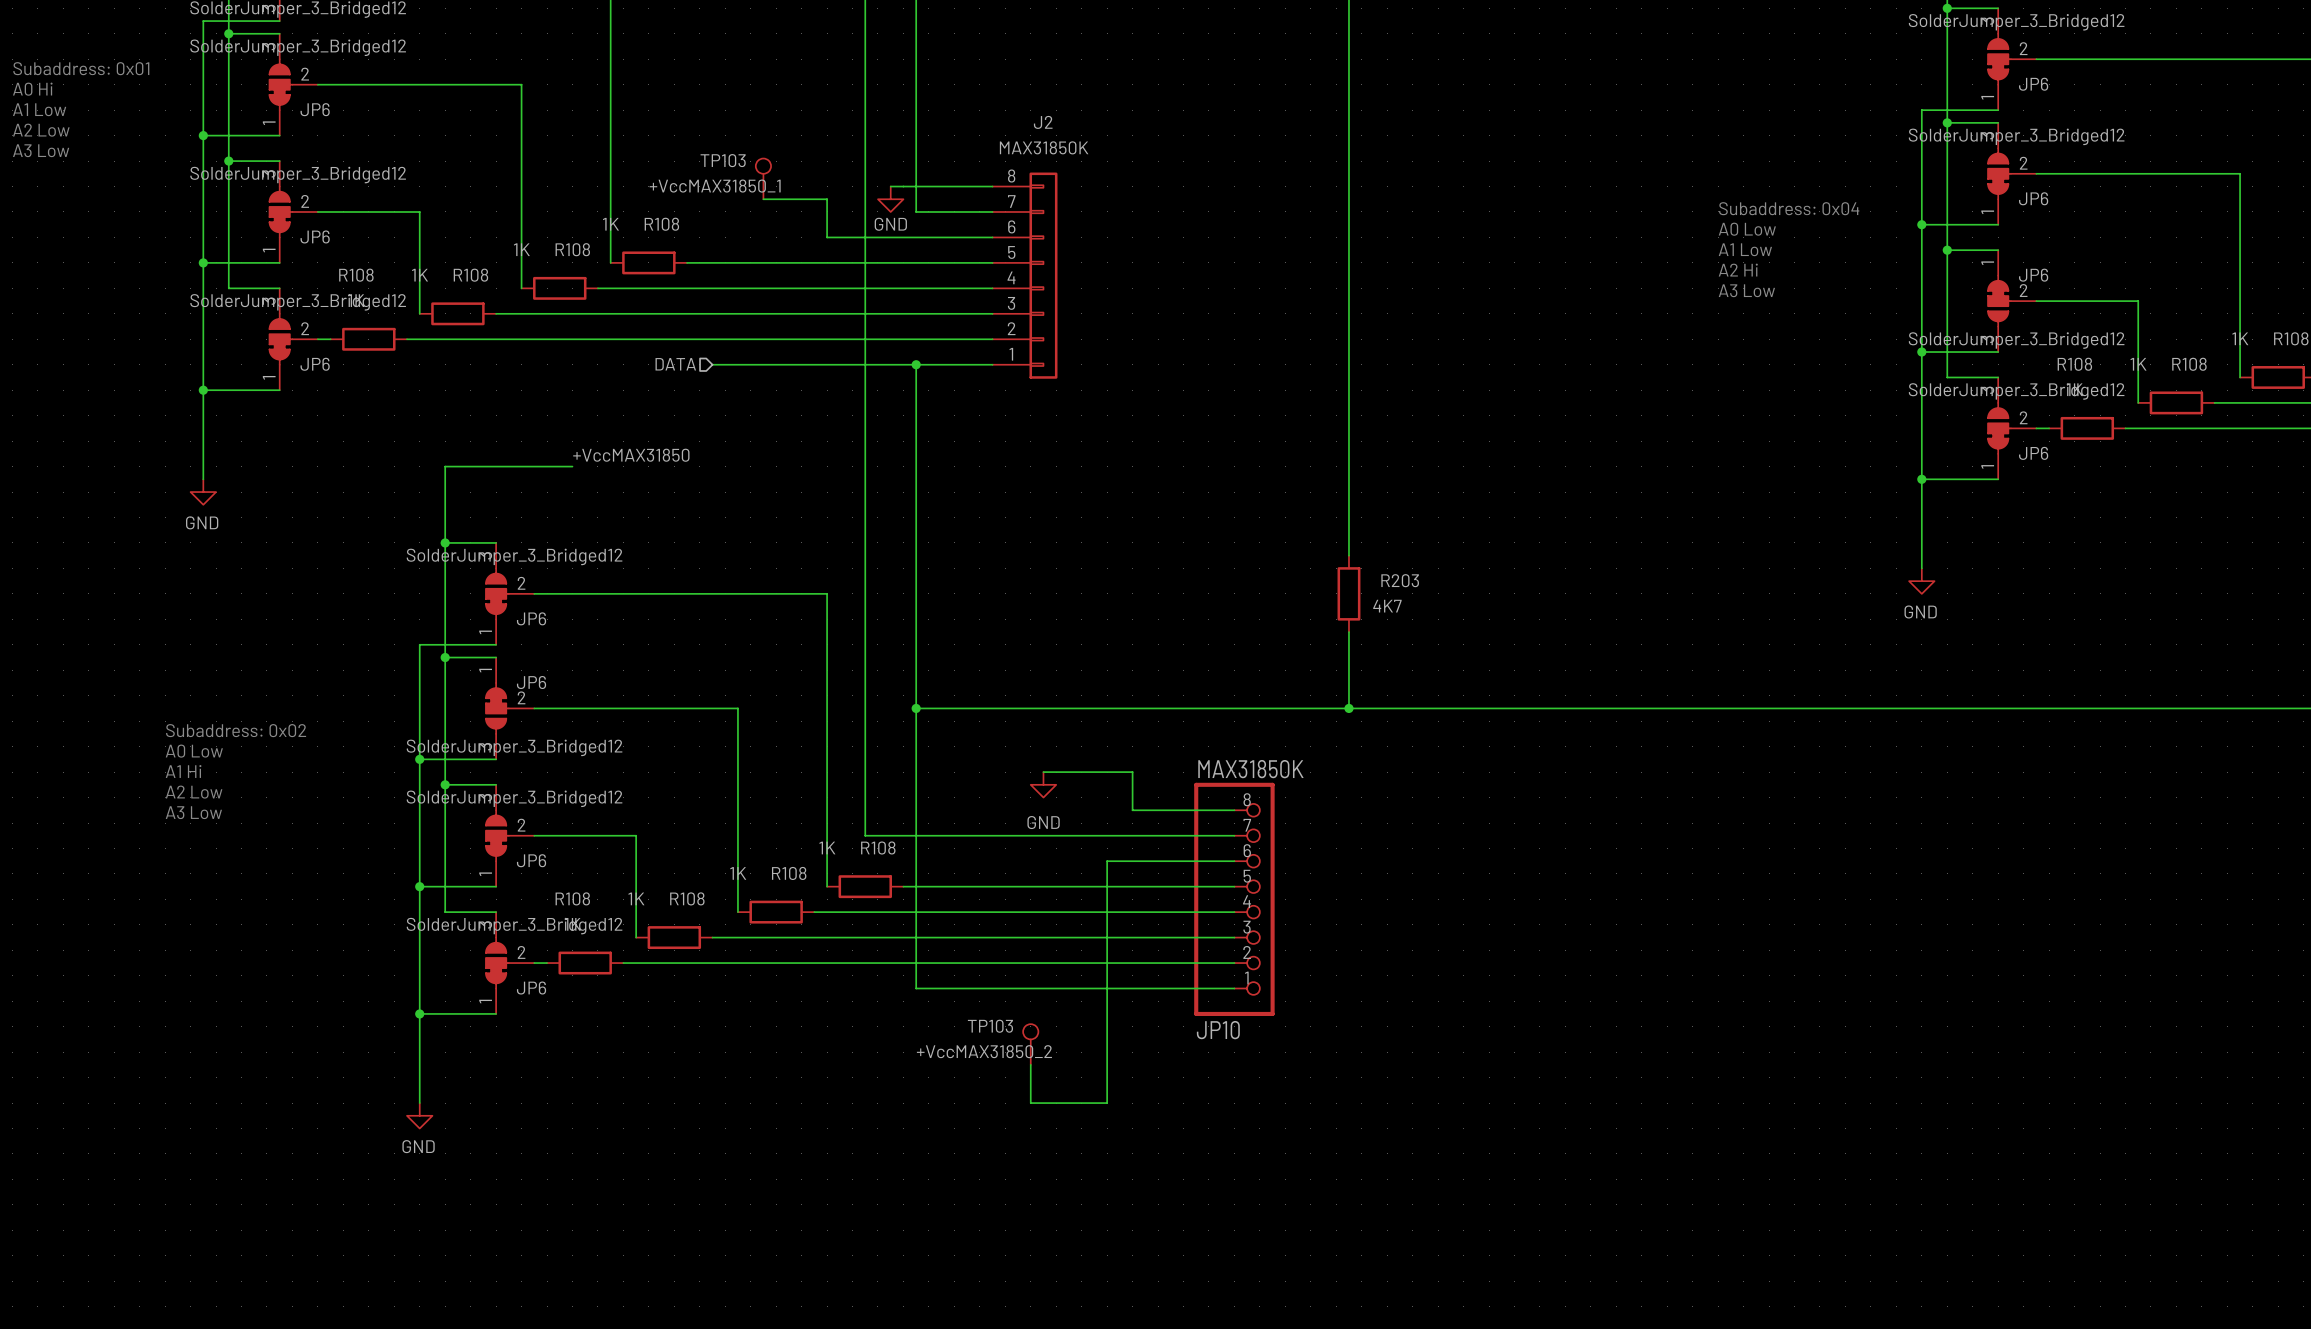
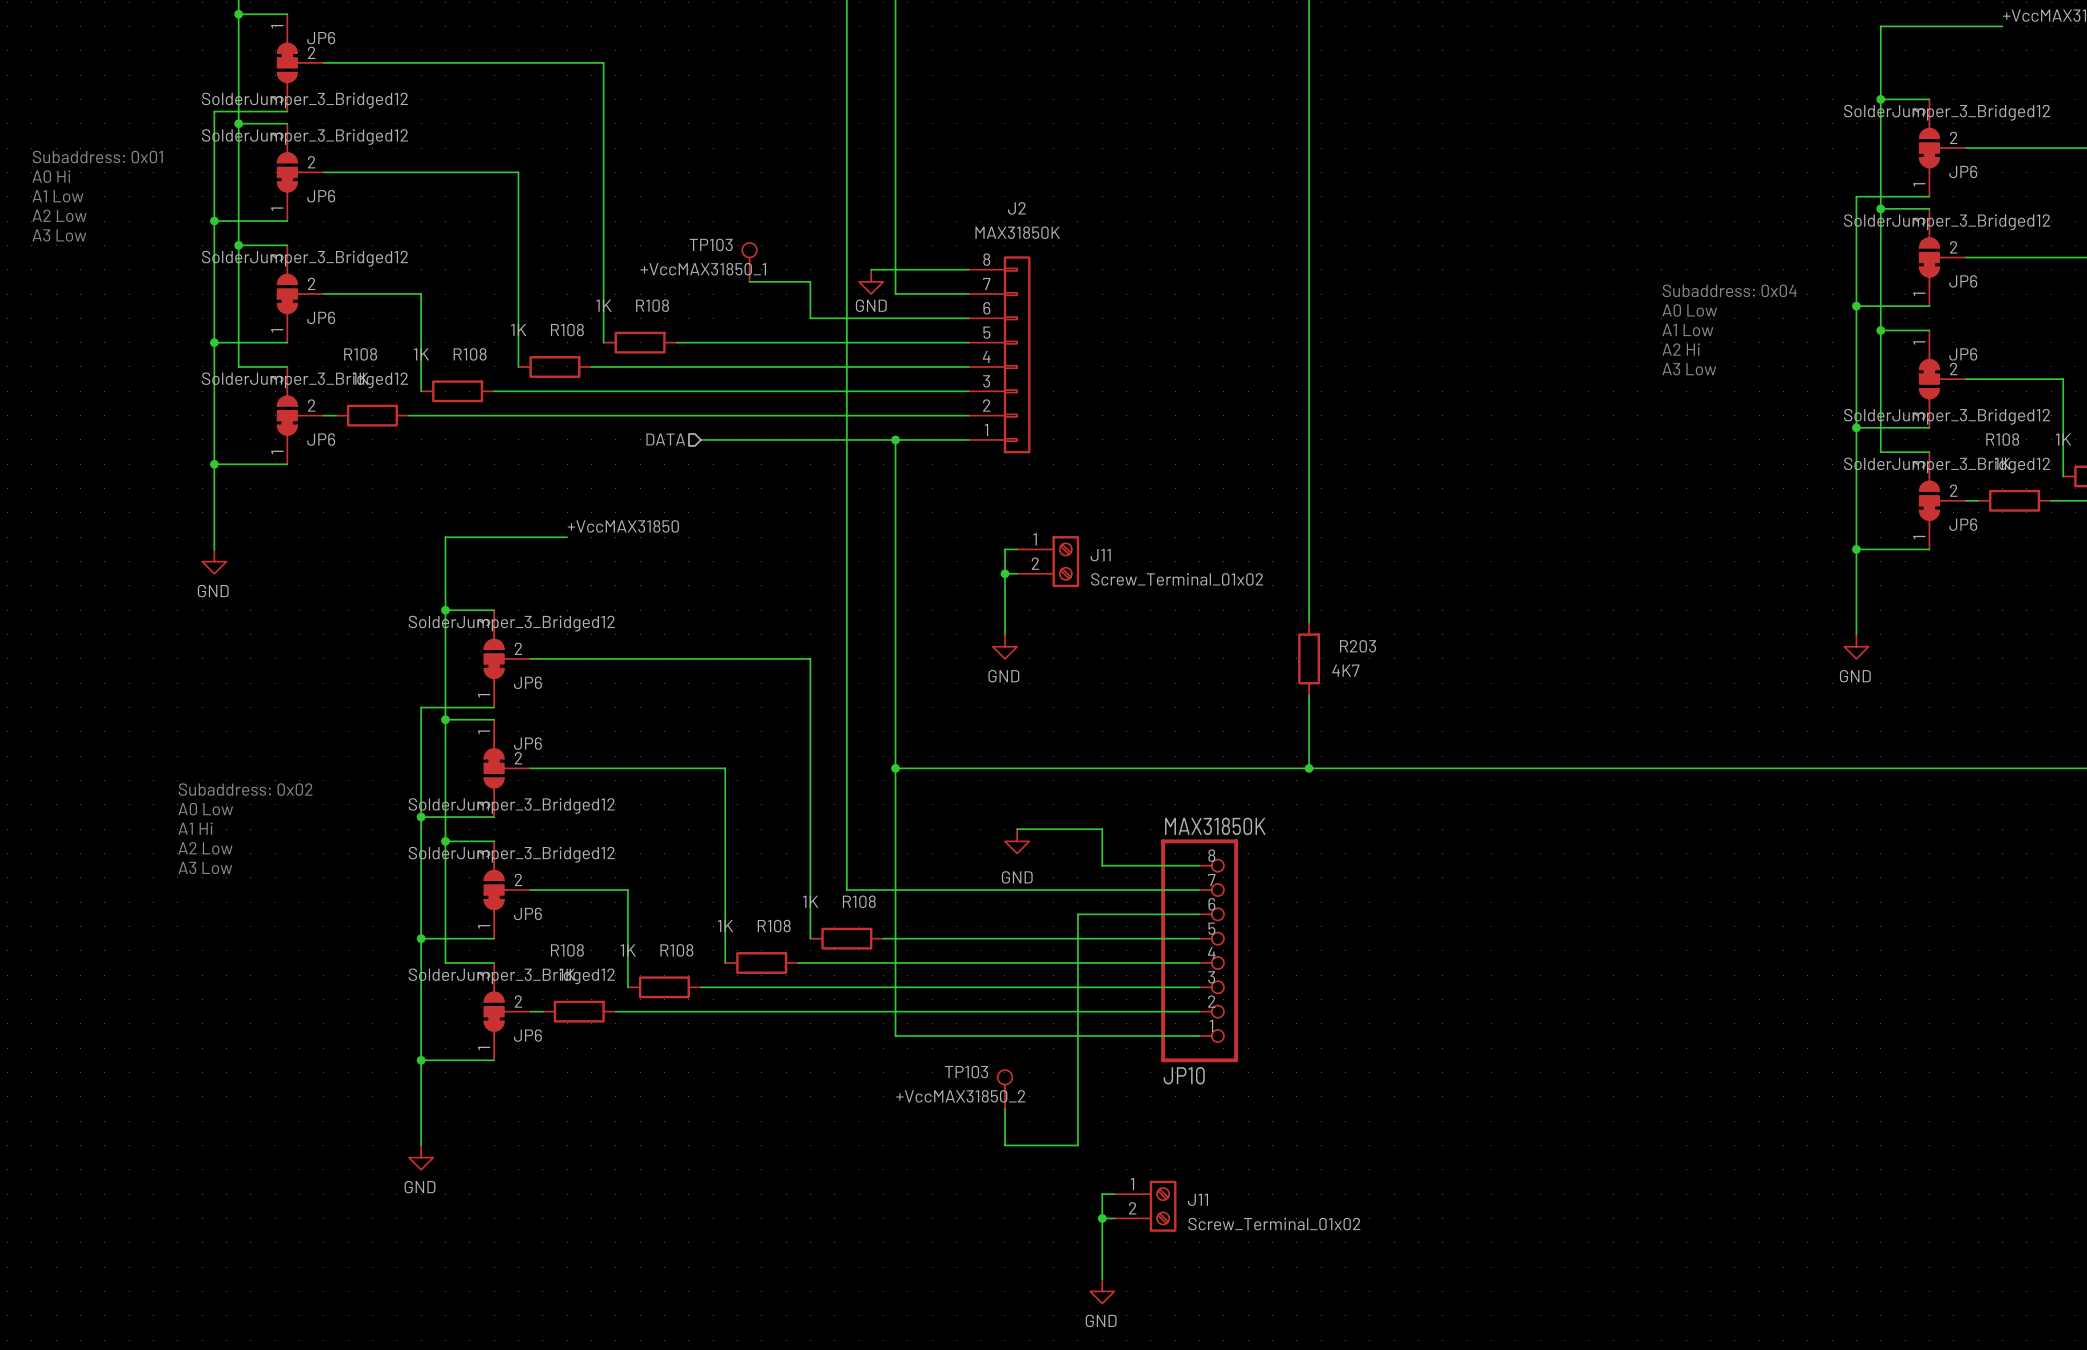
wire: none -> (1017, 549) (1004, 549) (1004, 634)
J11: none -> Screw_Terminal_01x02 (1048, 561)
wire: none -> (1004, 573) (1017, 573)
junction: none -> (1004, 573)
power symbol: none -> GND (1004, 646)
wire: none -> (1114, 1194) (1102, 1194) (1102, 1279)
J11: none -> Screw_Terminal_01x02 (1145, 1206)
wire: none -> (1102, 1218) (1114, 1218)
junction: none -> (1102, 1218)
power symbol: none -> GND (1102, 1291)

